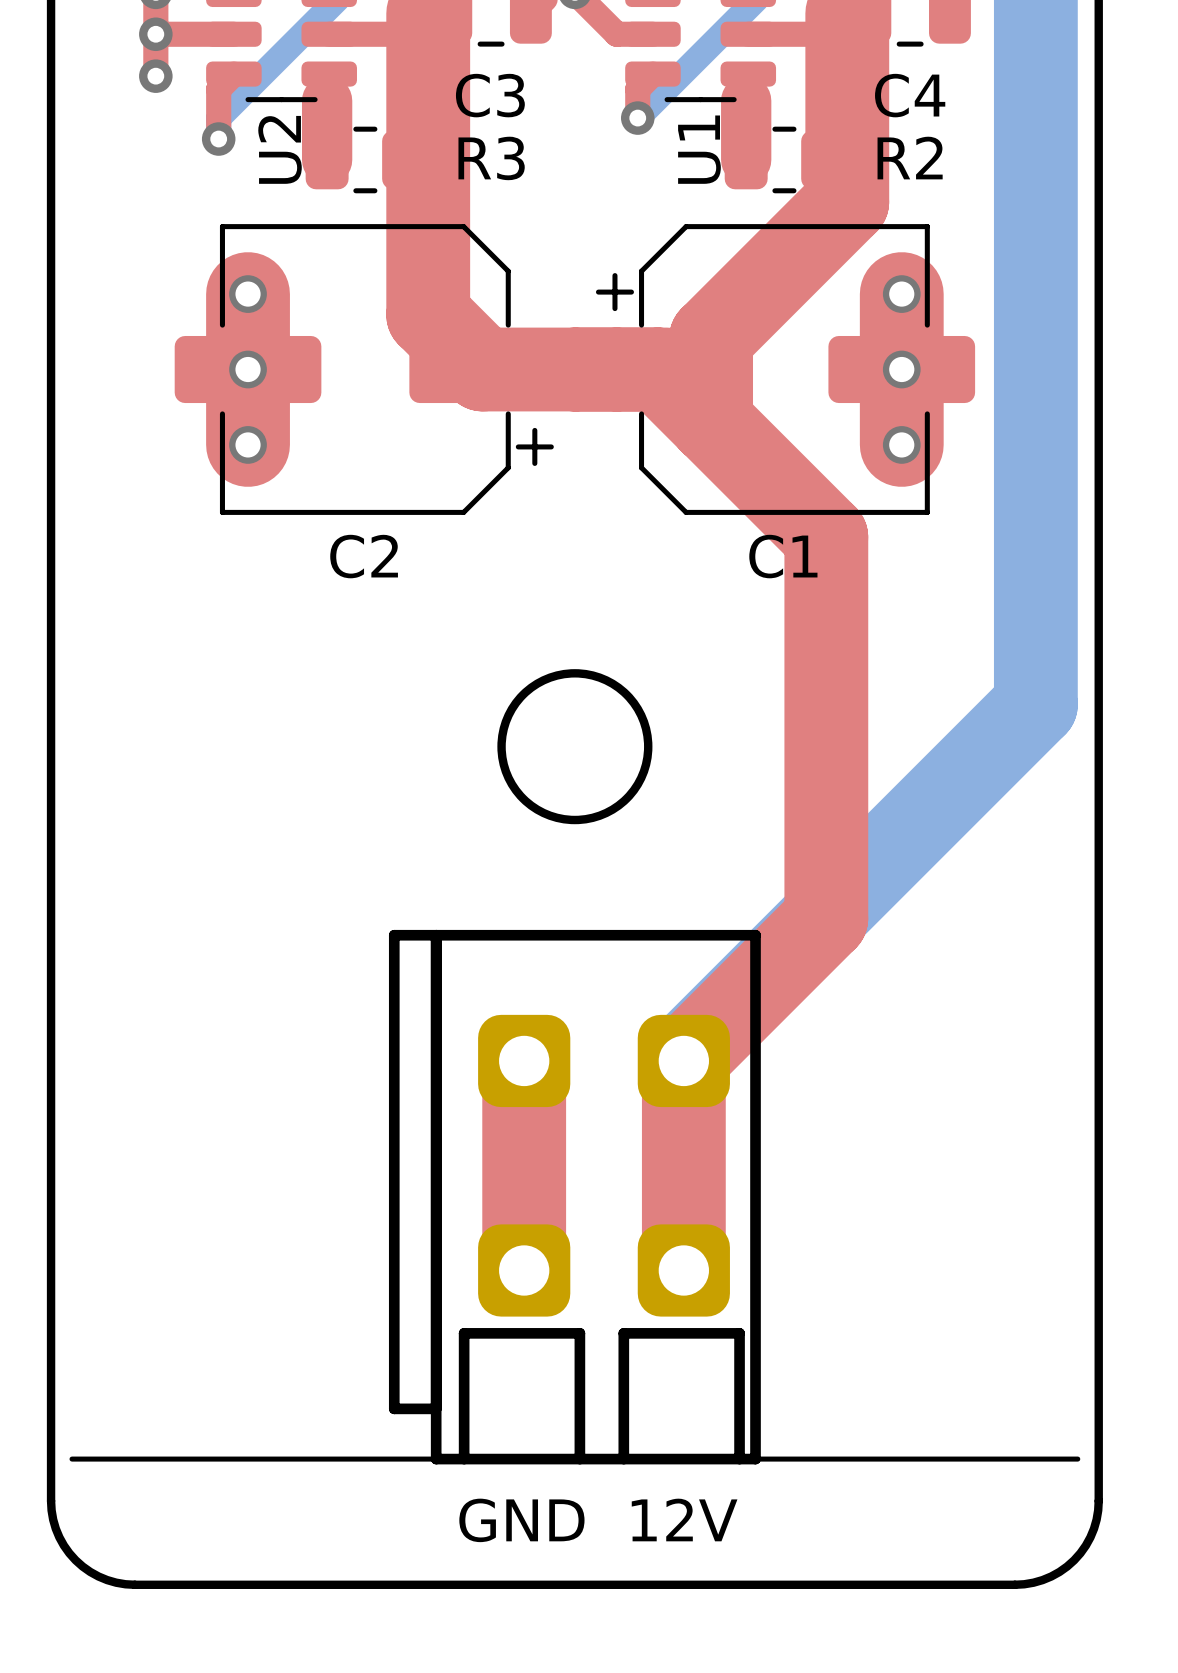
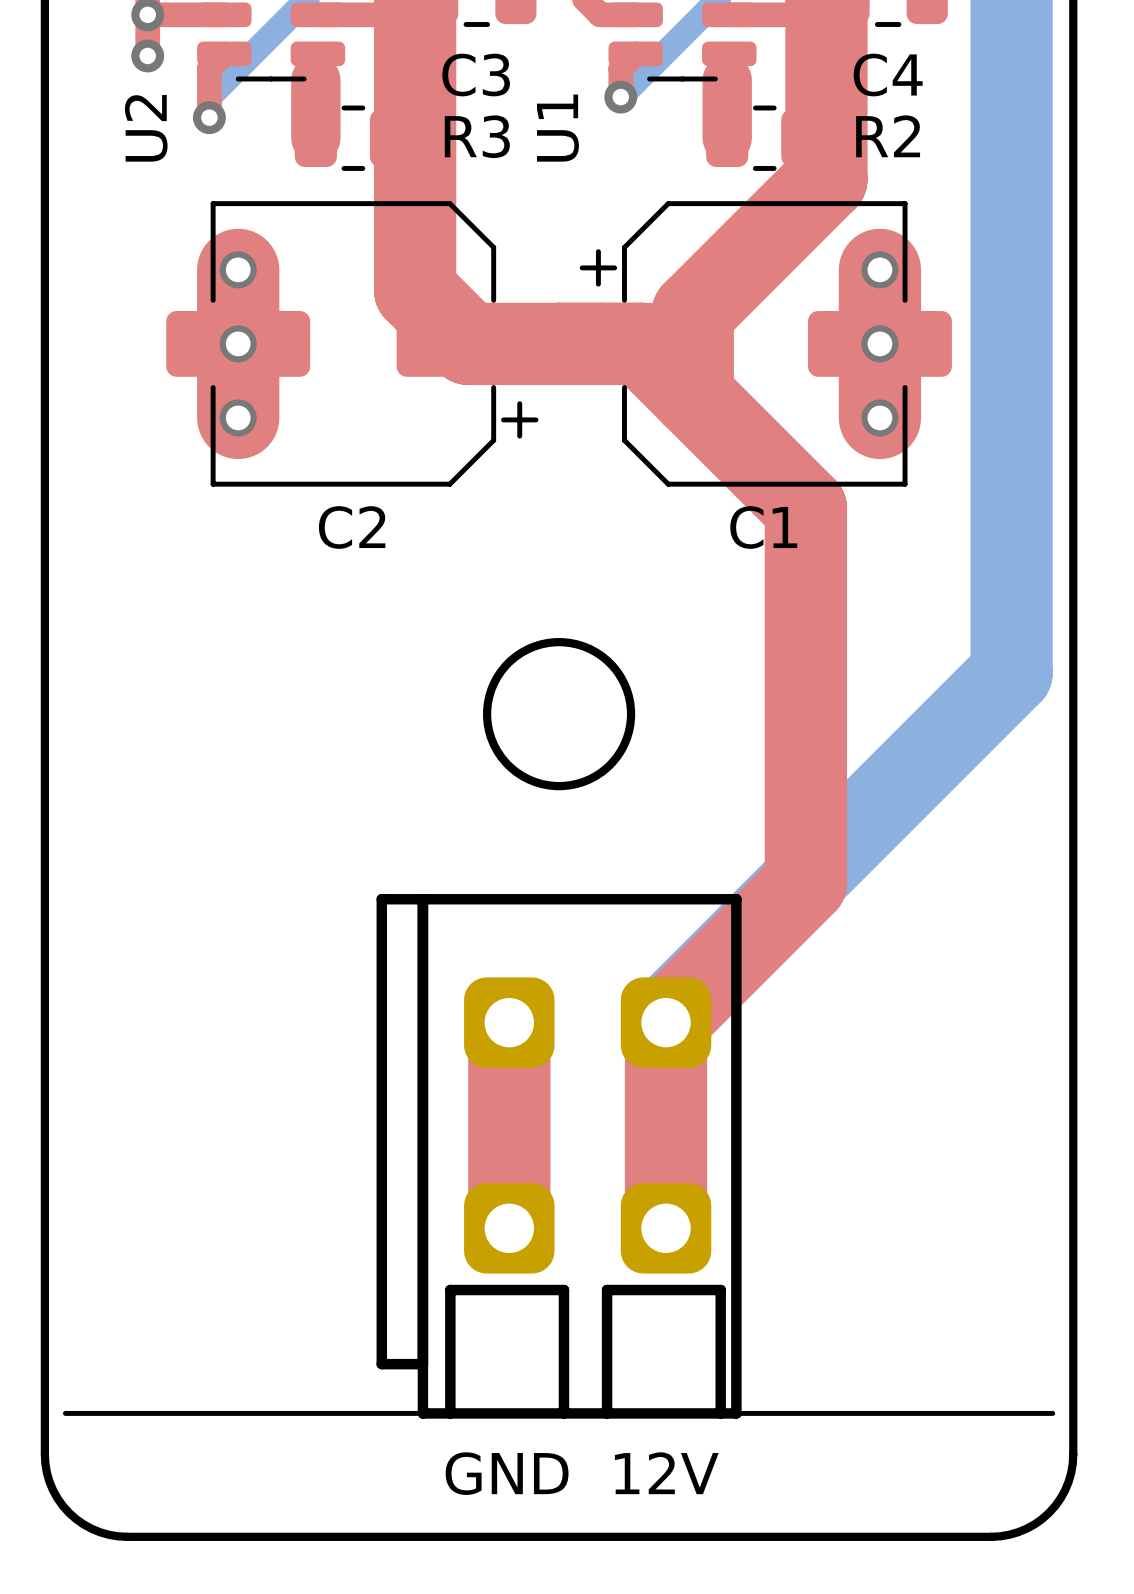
U2 name position: U2 (280, 149) -> U2 (146, 128)
U1 name position: U1 (699, 149) -> U1 (557, 128)

